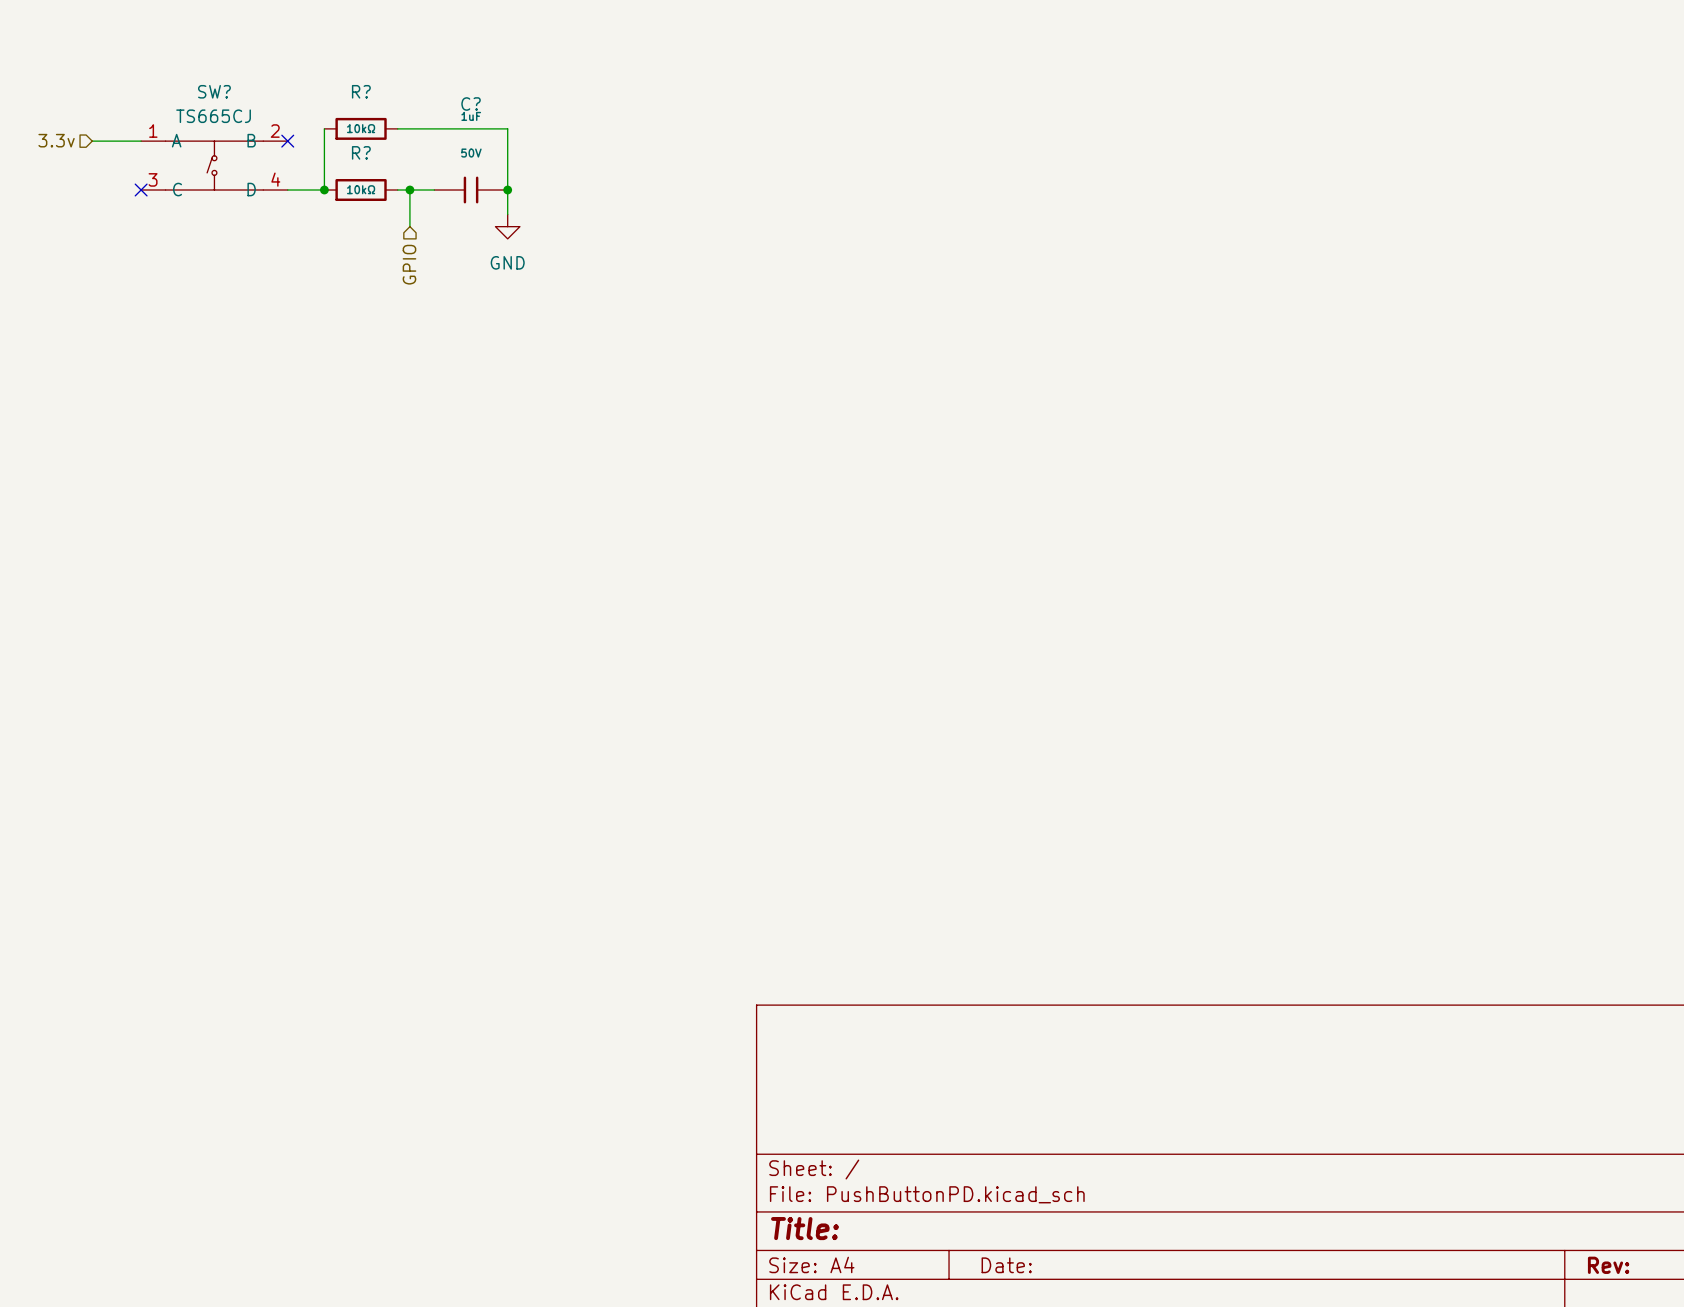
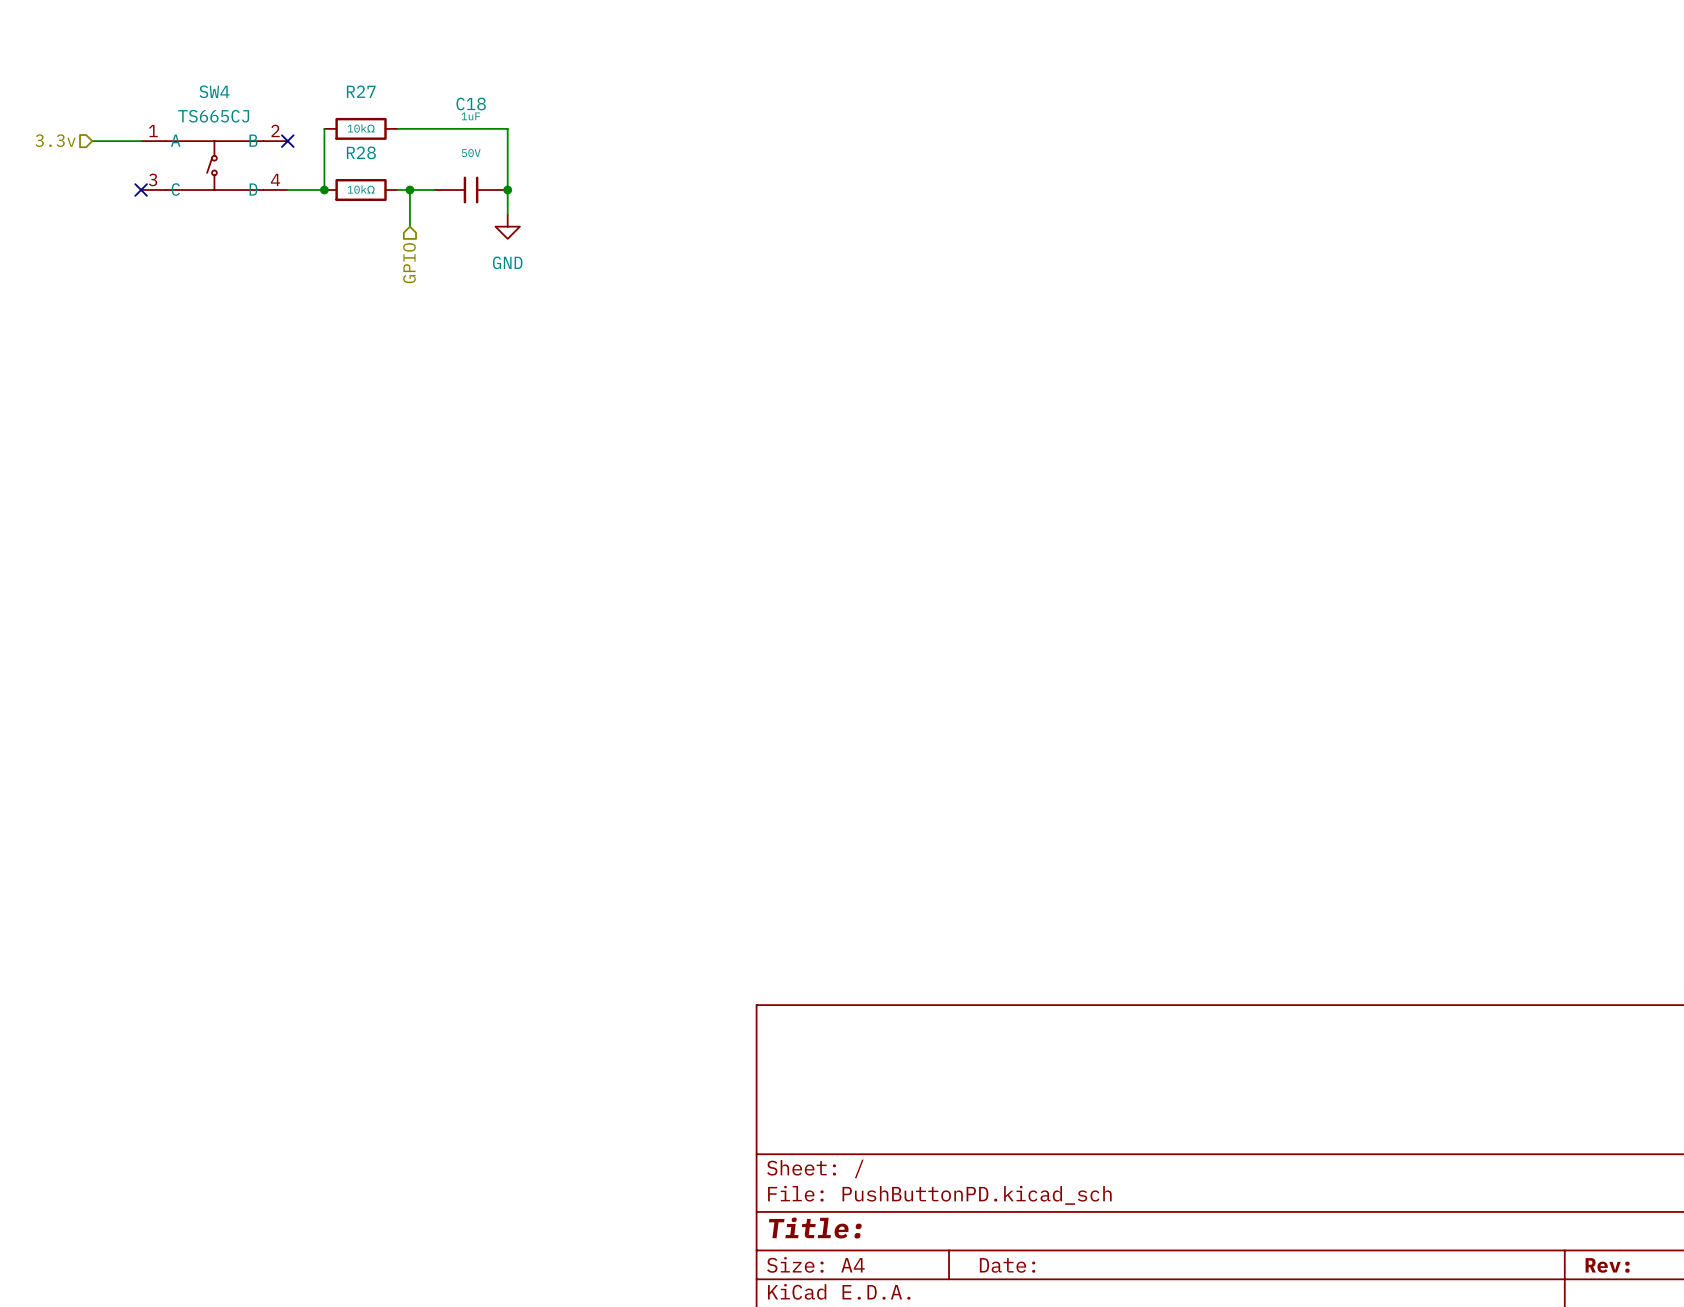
SW? name: SW? (214, 91) -> SW4 (214, 91)
R? name: R? (361, 91) -> R27 (361, 91)
C? name: C? (471, 104) -> C18 (471, 104)
R? name: R? (361, 152) -> R28 (361, 152)

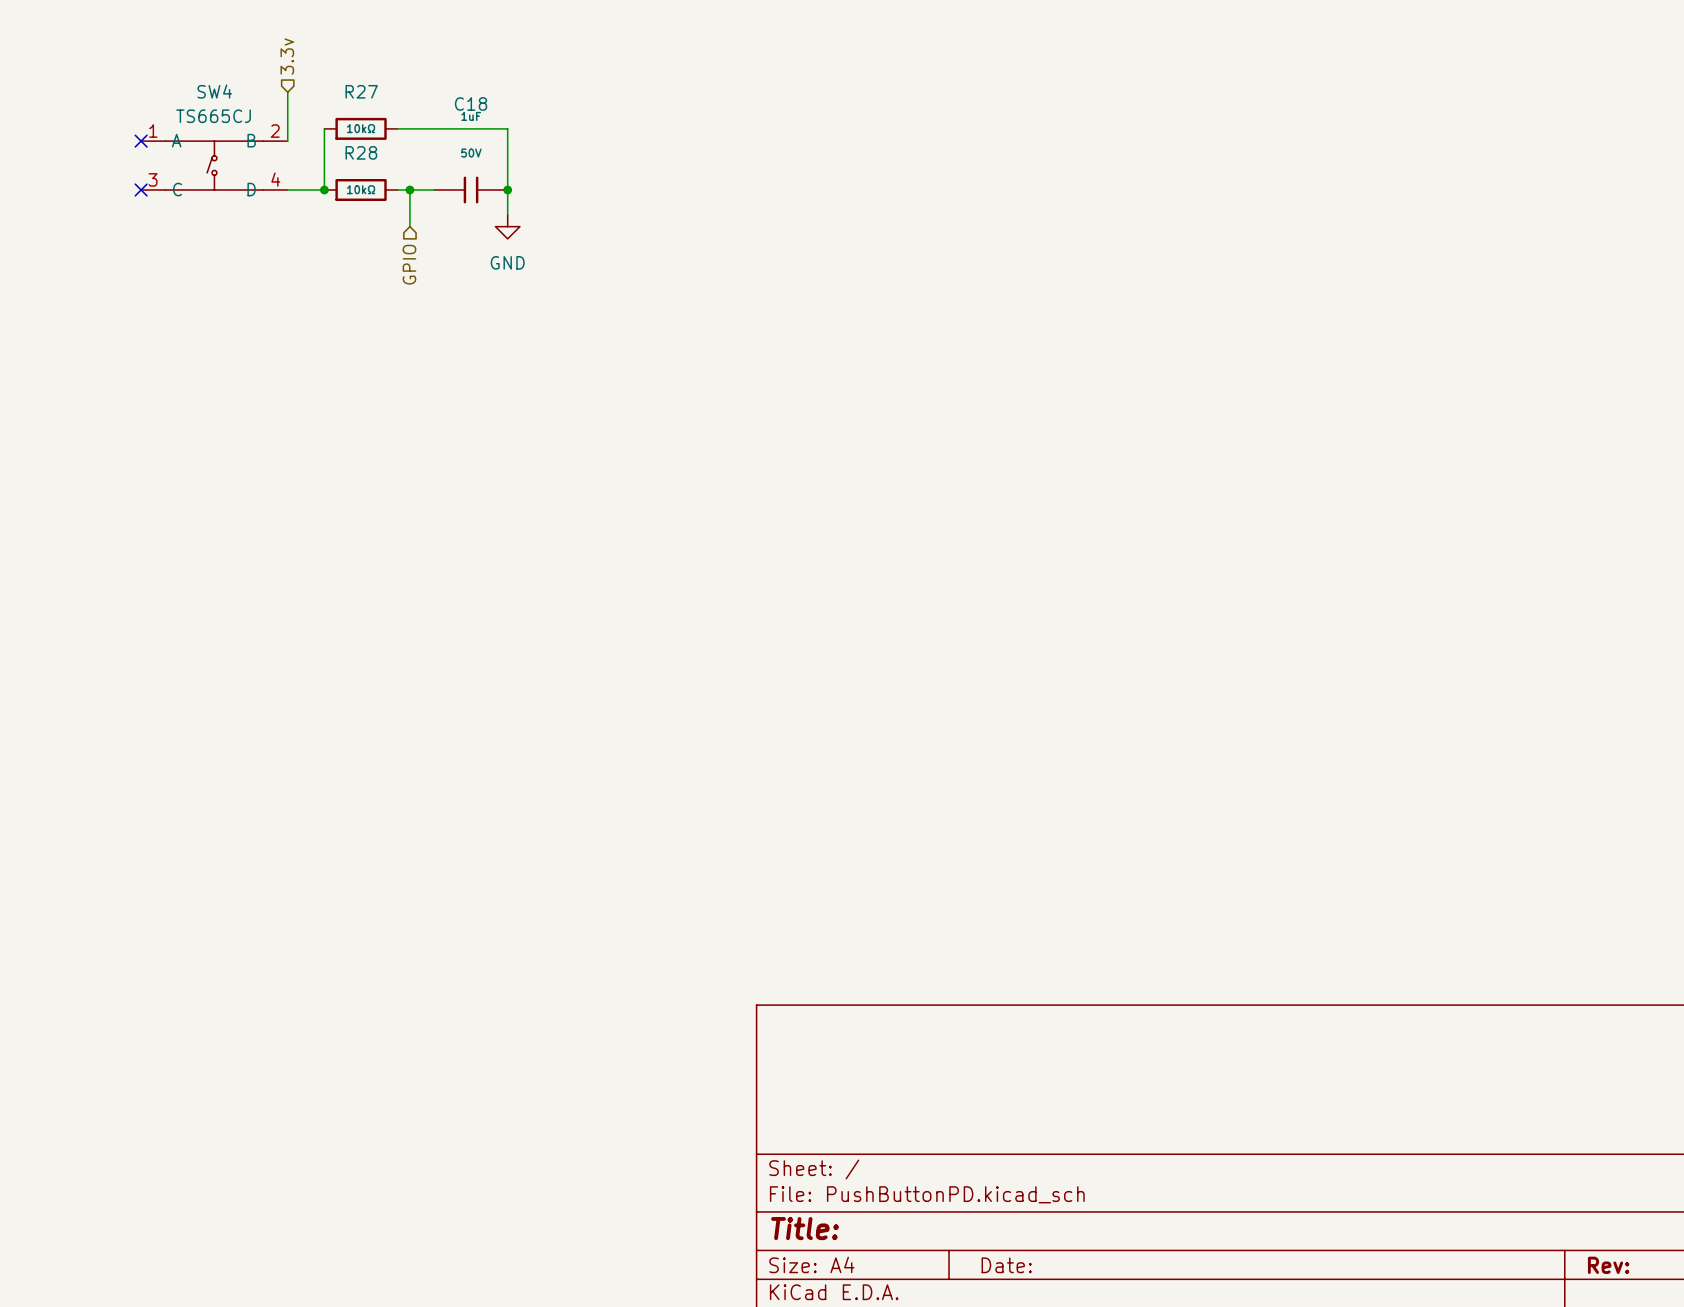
wire: none -> (287, 92) (287, 141)
hierarchical label rotation: 0° (55, 140) -> 90° clockwise (287, 56)
hierarchical label position: 3.3v (55, 140) -> 3.3v (287, 56)
wire: (92, 141) (141, 141) -> none
no-connect mark: none -> (141, 141)
no-connect mark: (287, 141) -> none

